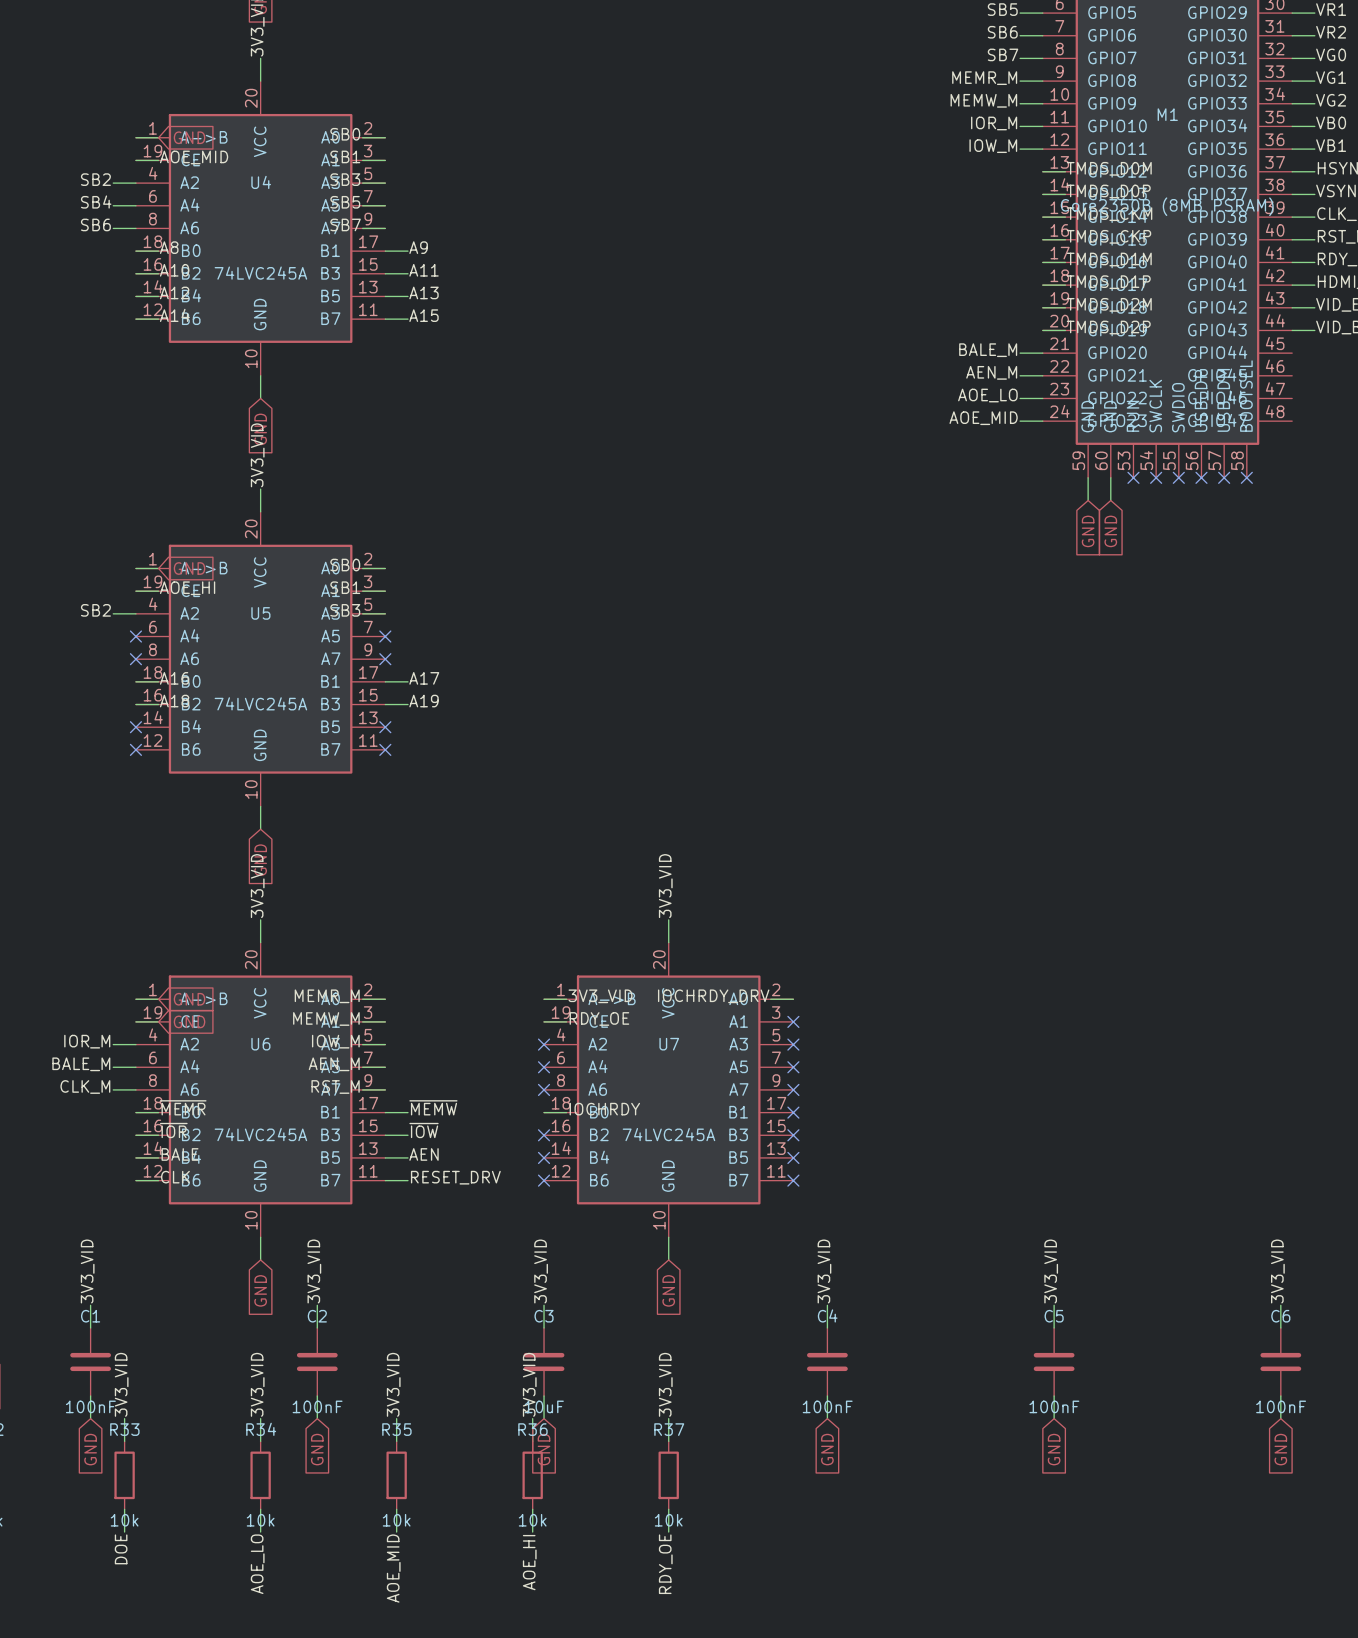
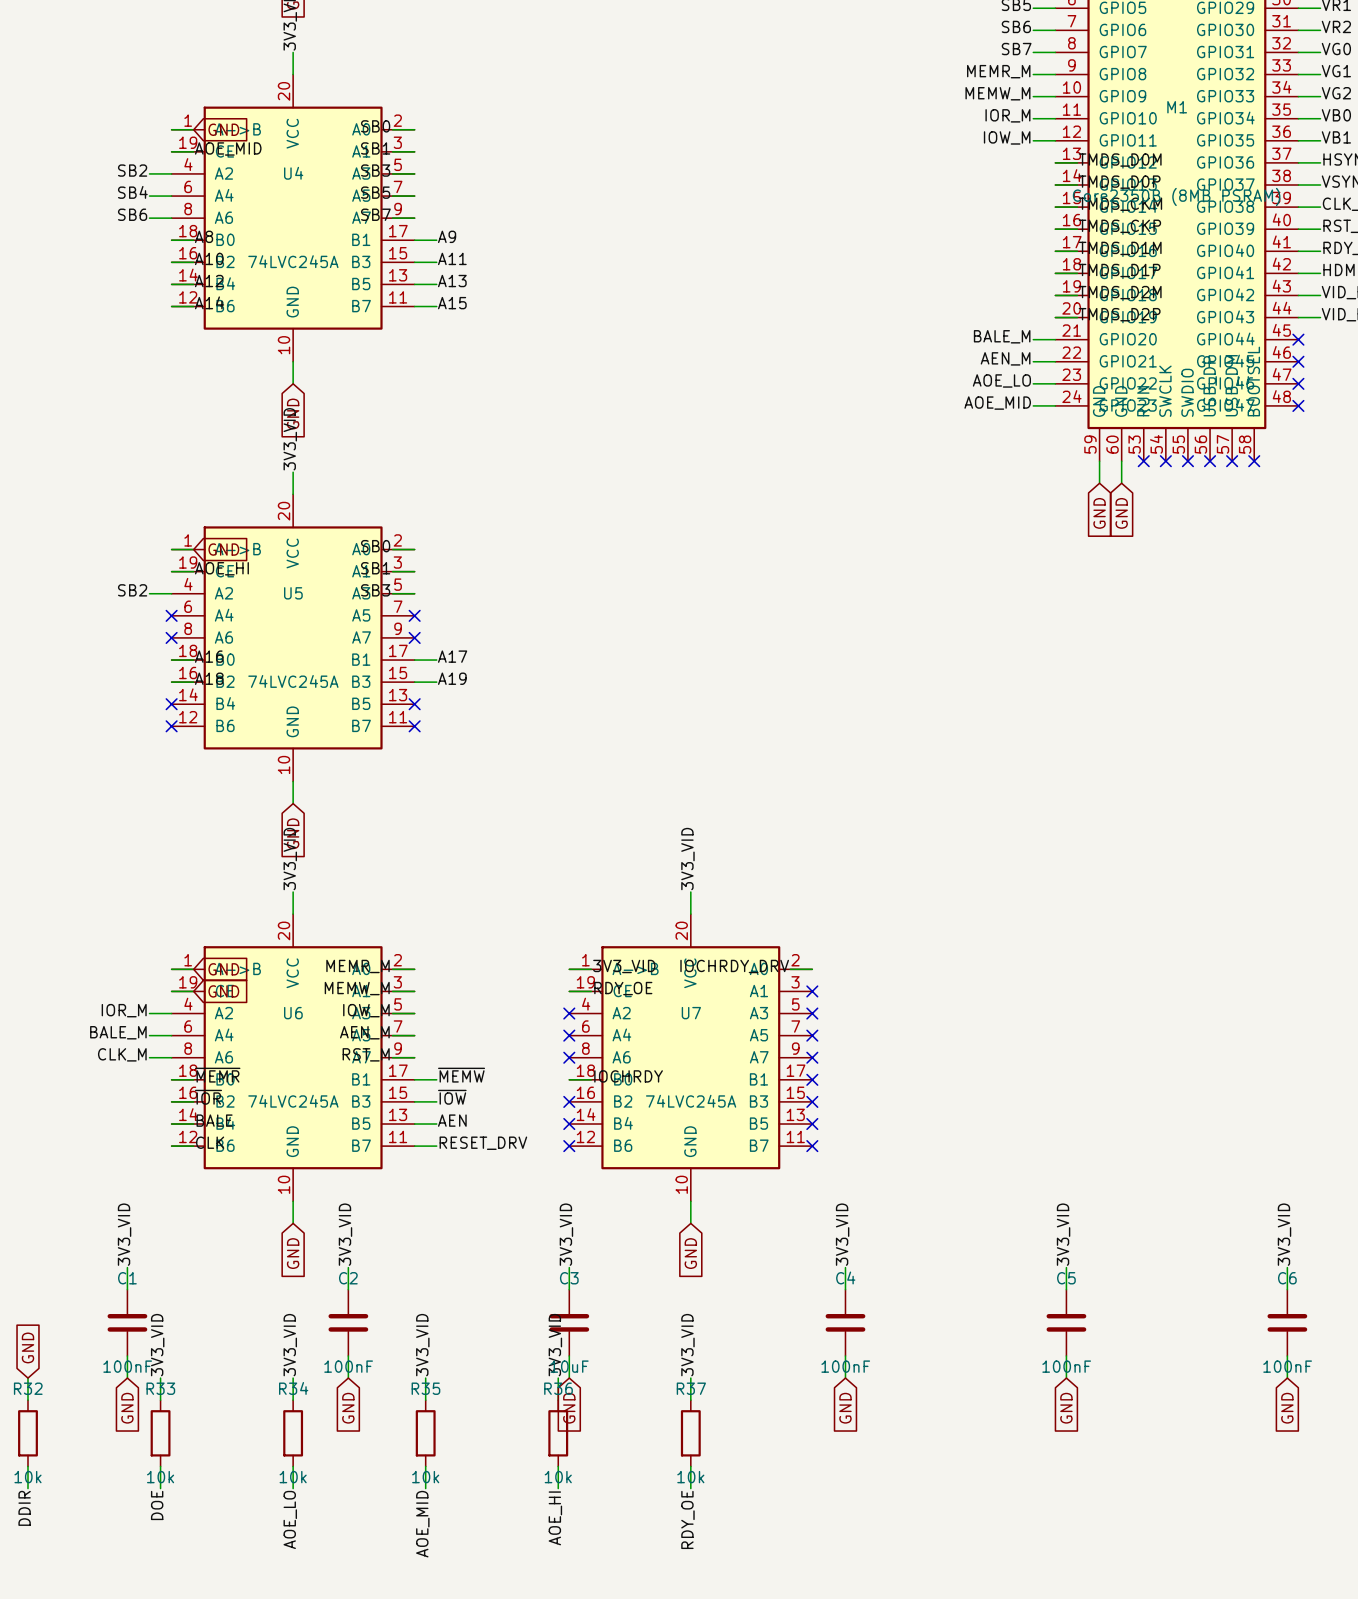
no-connect mark: none -> (1298, 339)
no-connect mark: none -> (1298, 361)
no-connect mark: none -> (1298, 383)
no-connect mark: none -> (1298, 405)

